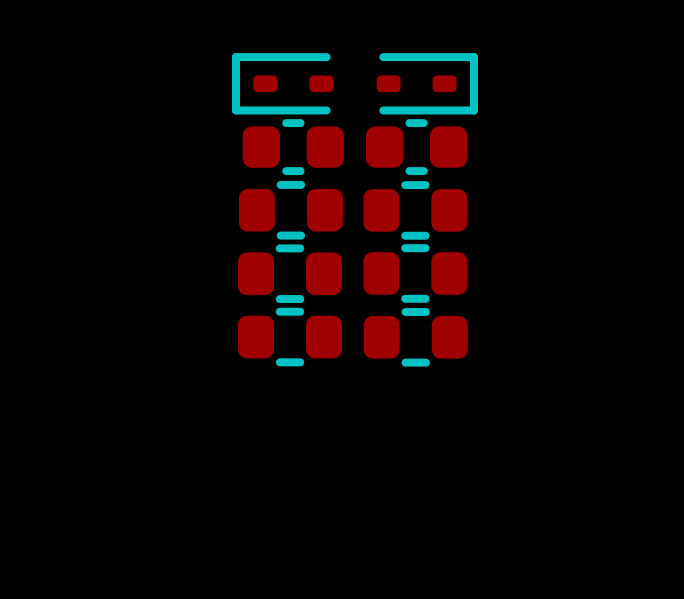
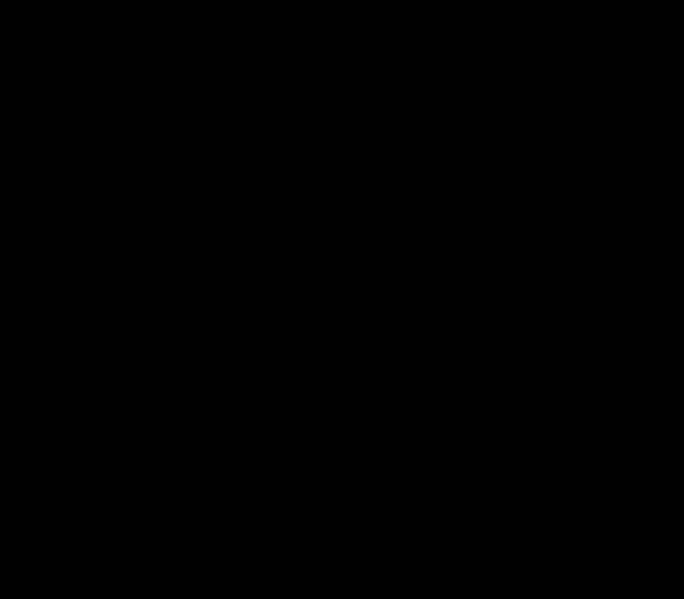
part: (282, 83) -> none
part: (427, 83) -> none
part: (293, 147) -> none
part: (416, 147) -> none
part: (290, 210) -> none
part: (415, 210) -> none
part: (290, 273) -> none
part: (415, 273) -> none
part: (290, 337) -> none
part: (415, 337) -> none

